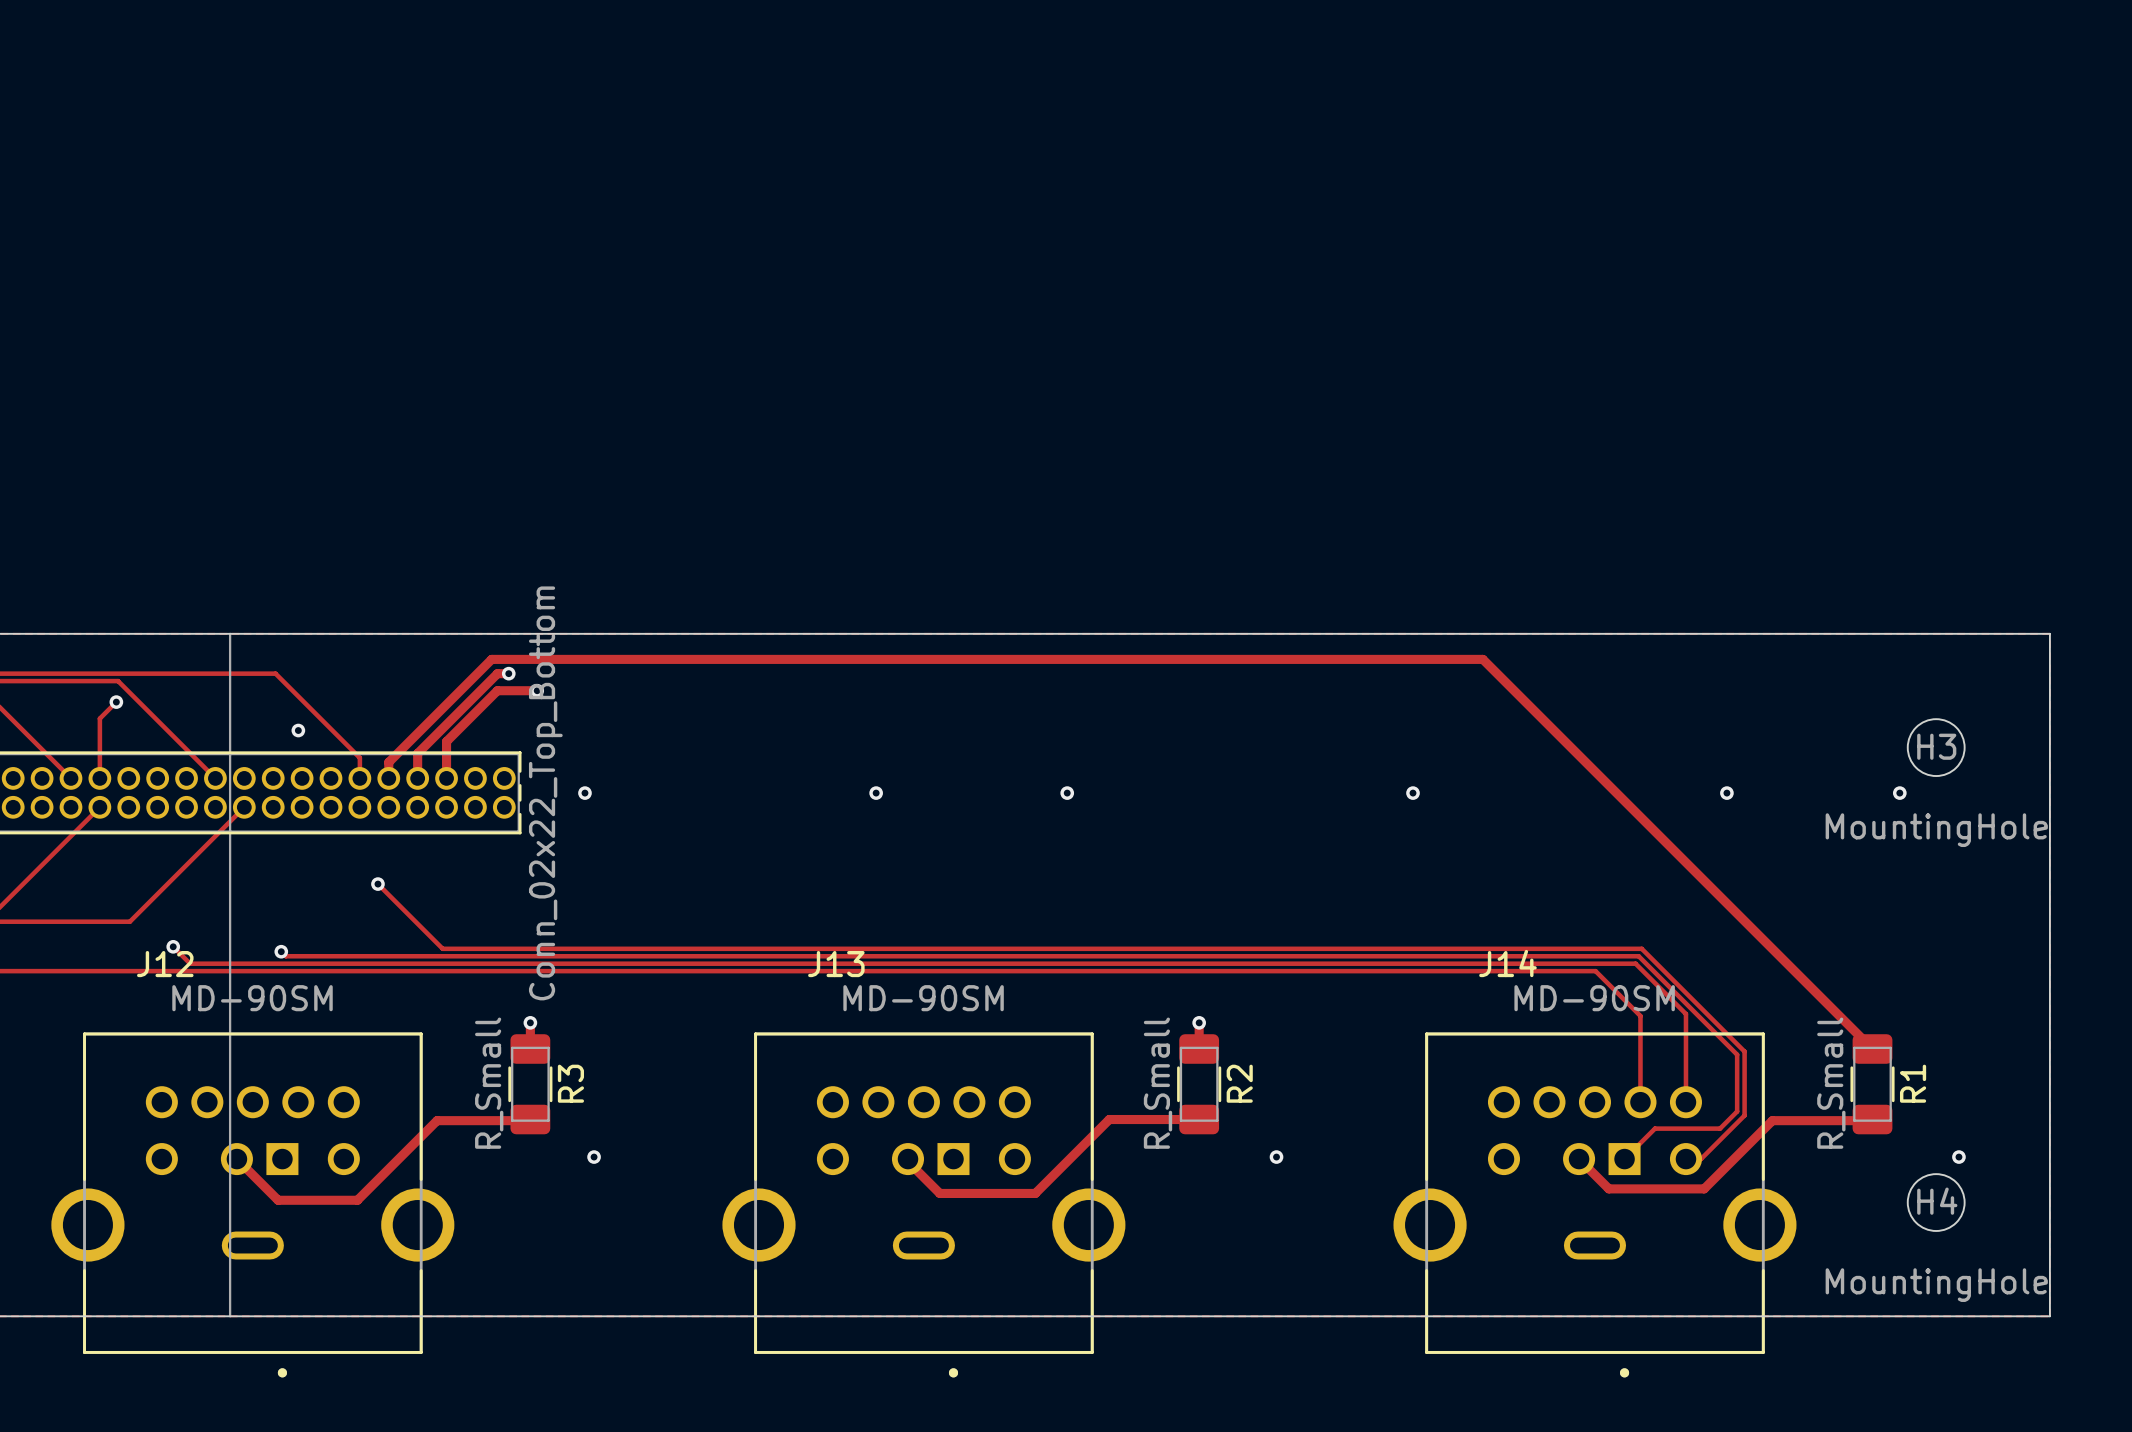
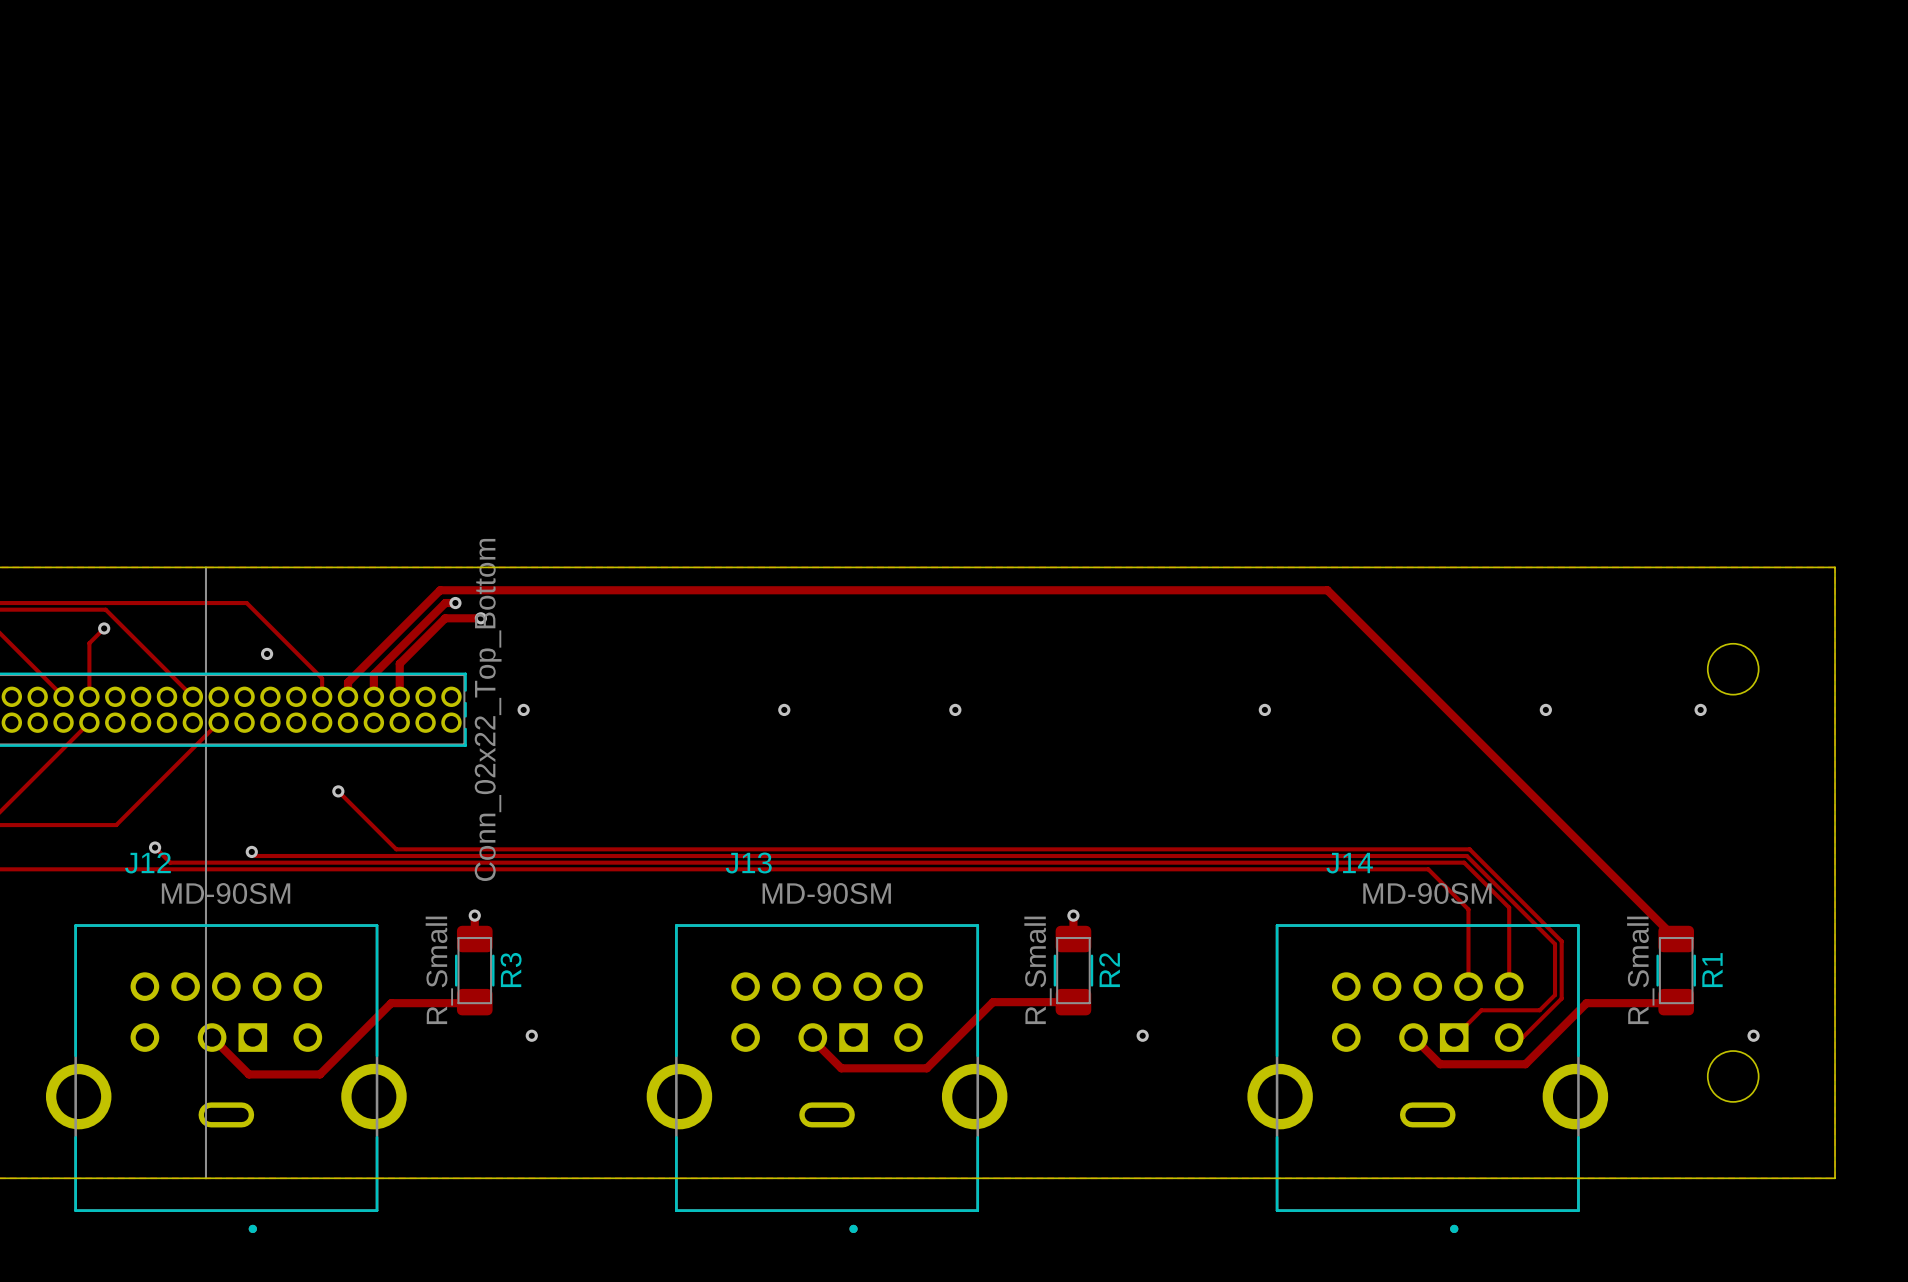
H3 name: H3 (1936, 746) -> none
H3 value: MountingHole (1936, 830) -> none
H4 name: H4 (1937, 1201) -> none
H4 value: MountingHole (1936, 1285) -> none

